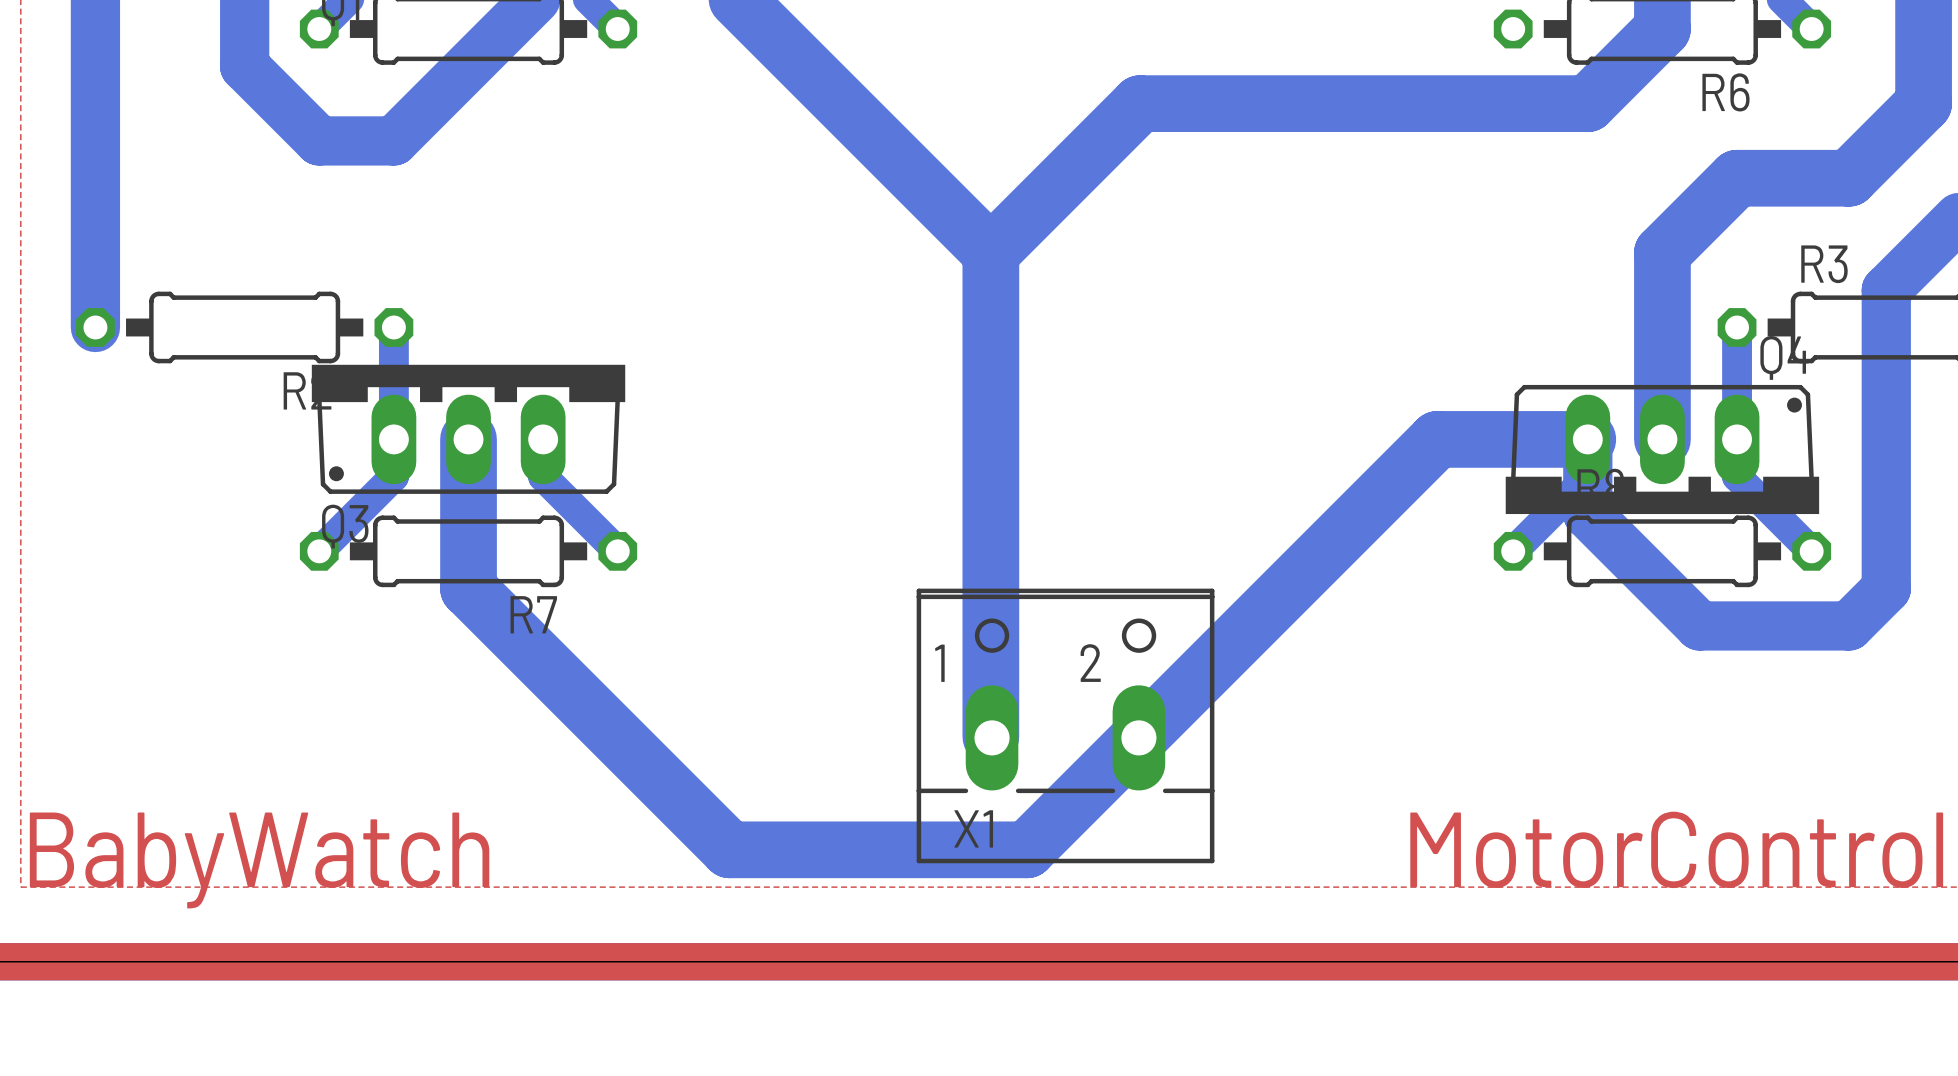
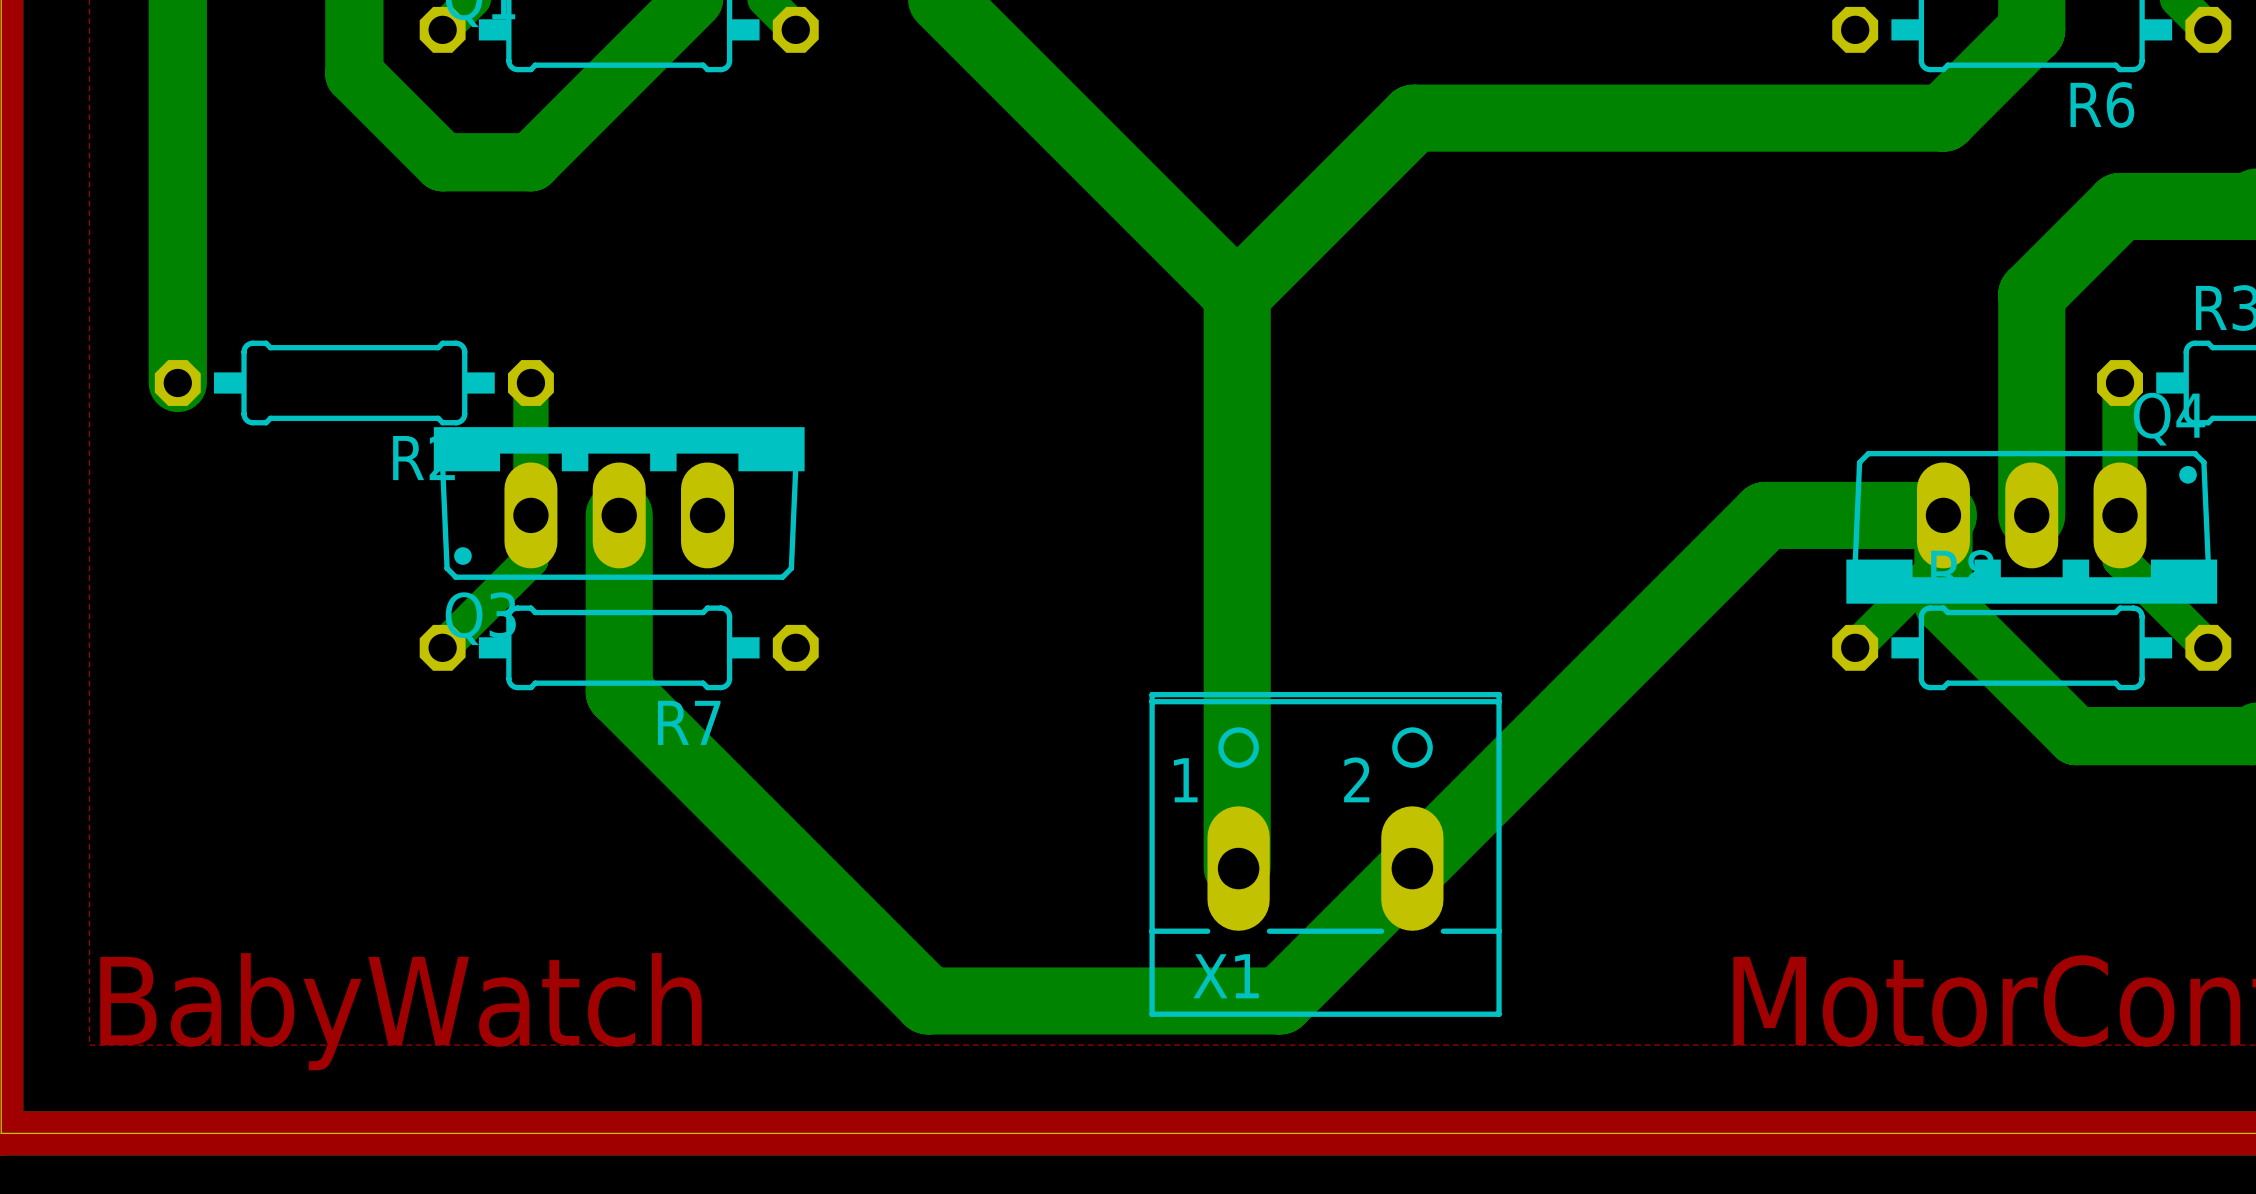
bottom track: (543, 439) (543, 476) (617, 551) -> none

